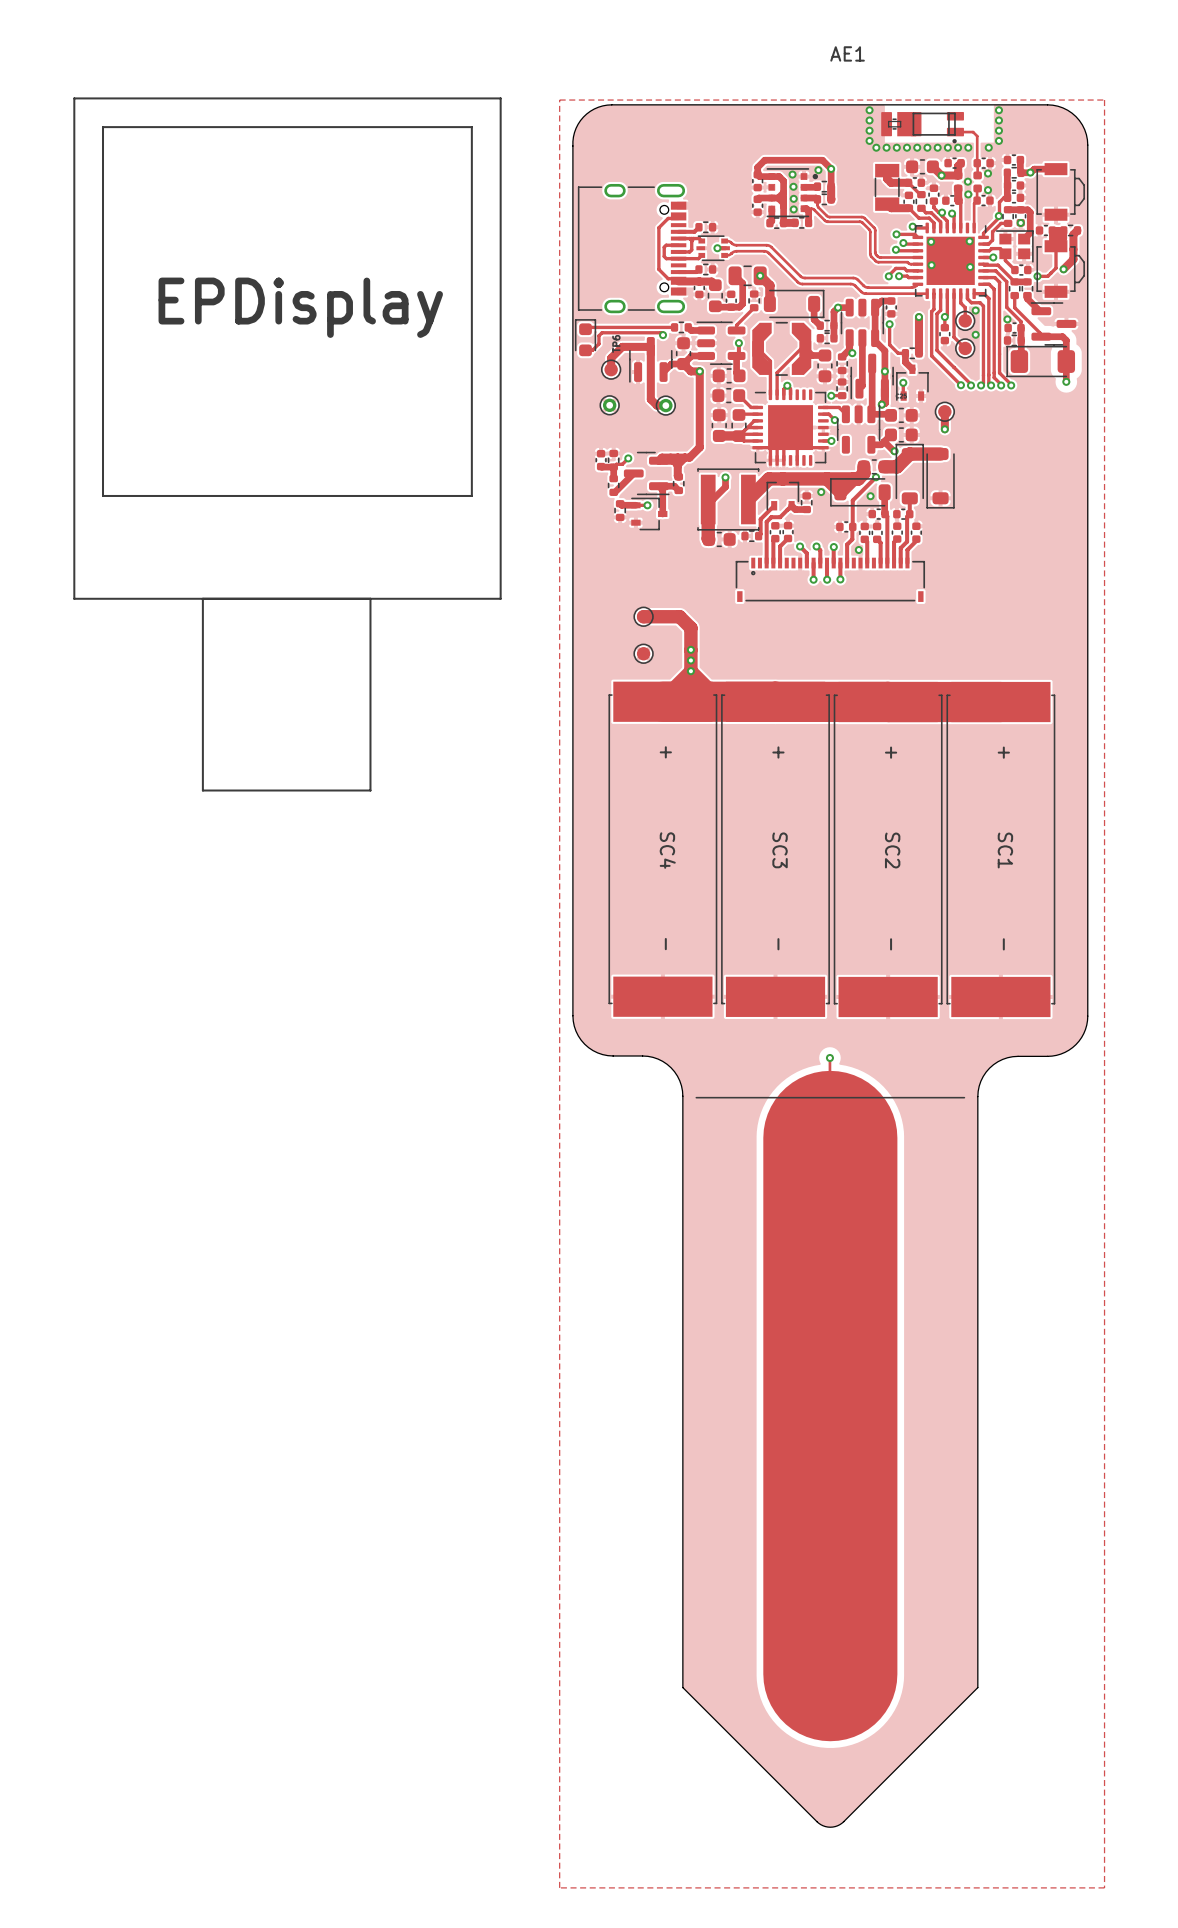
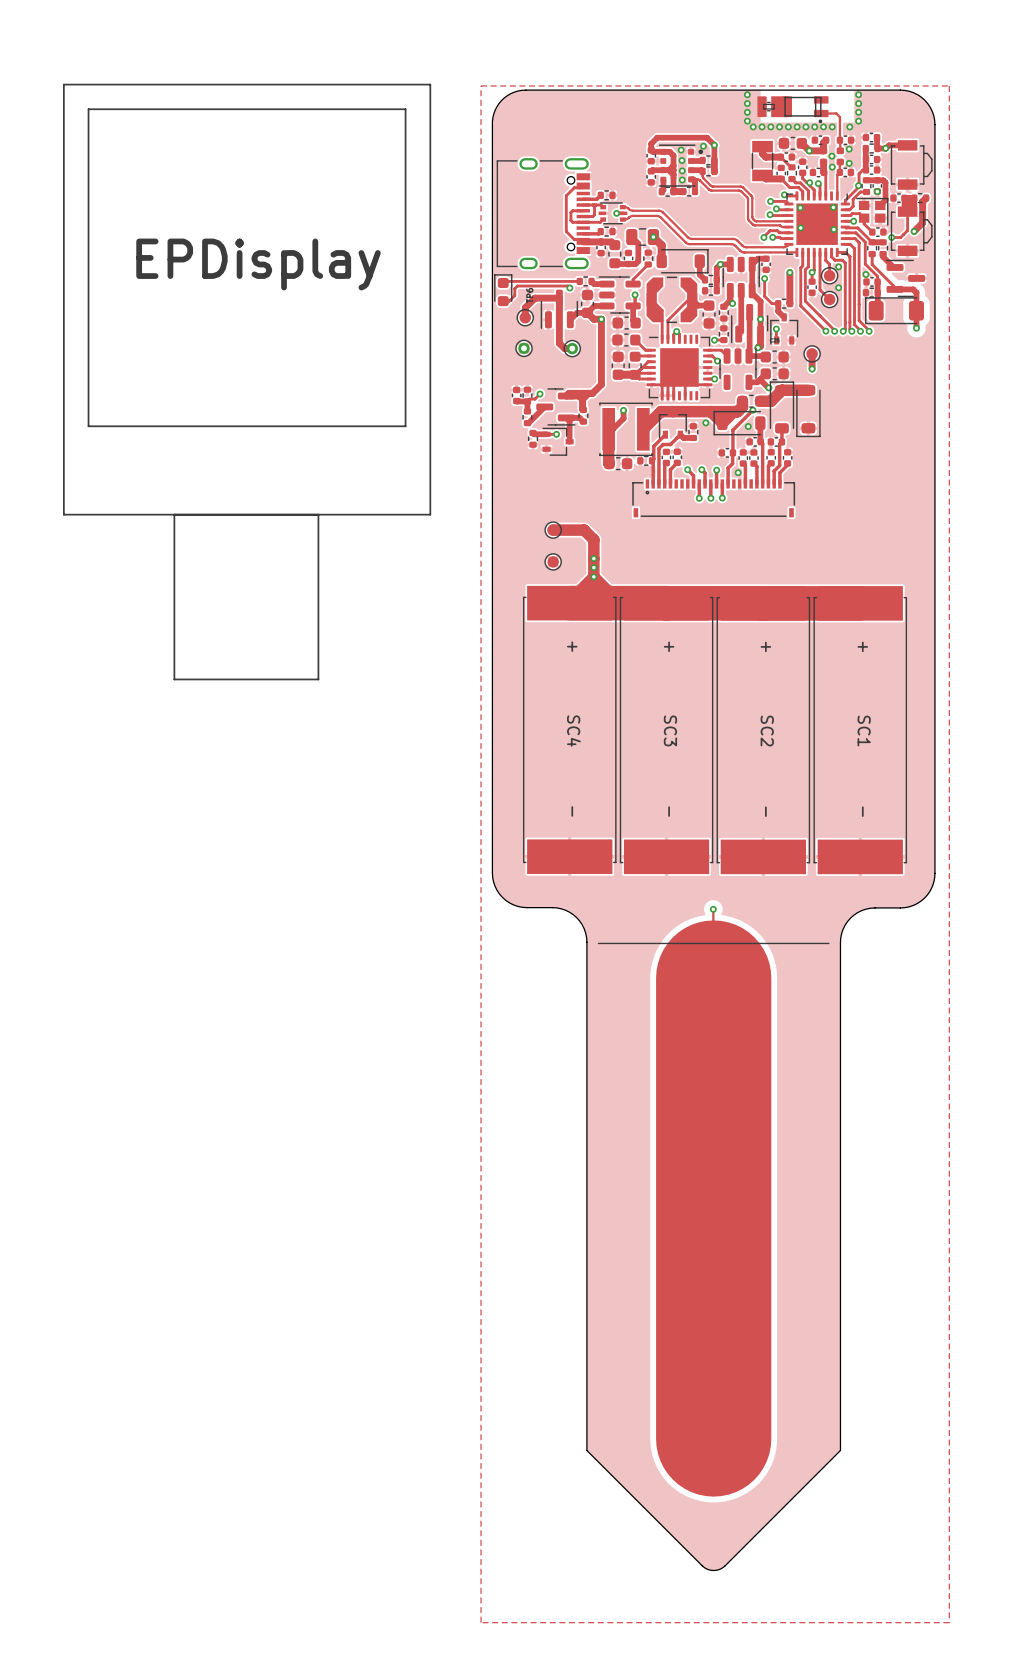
AE1 name: AE1 (847, 53) -> none
track: none -> (652, 460) (653, 483)

